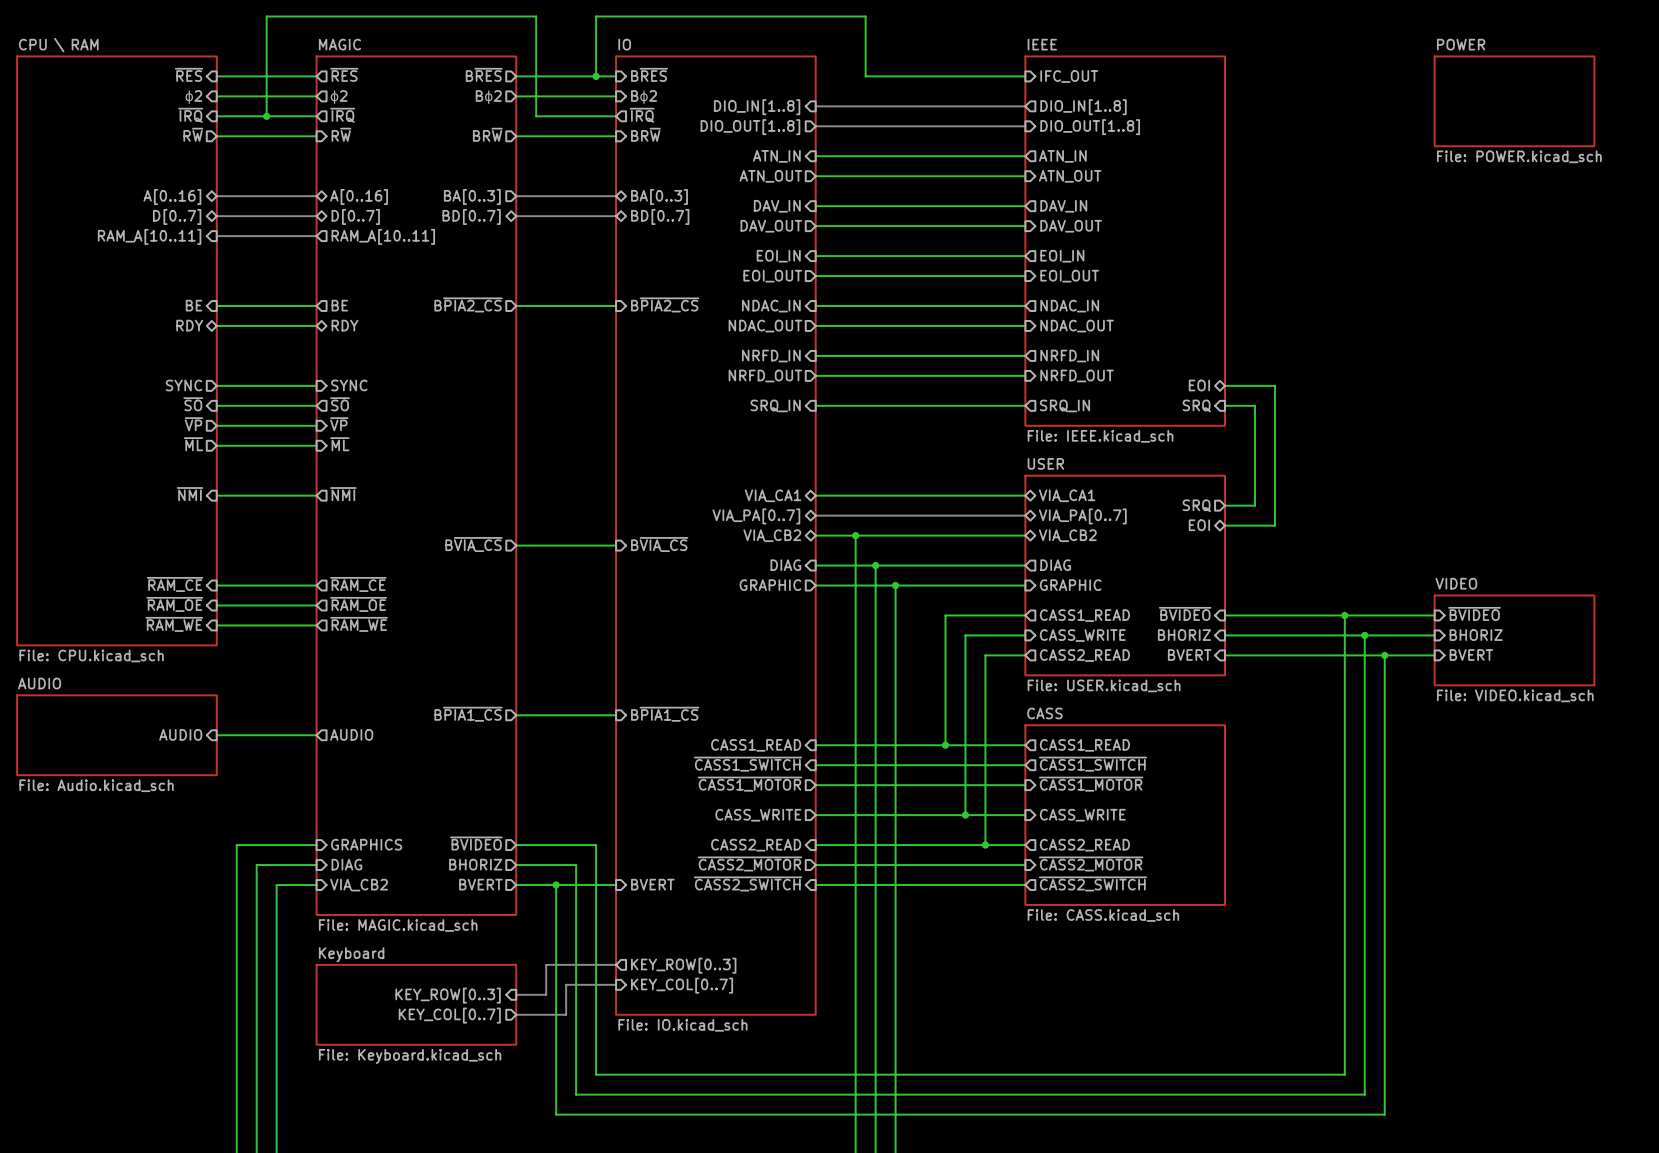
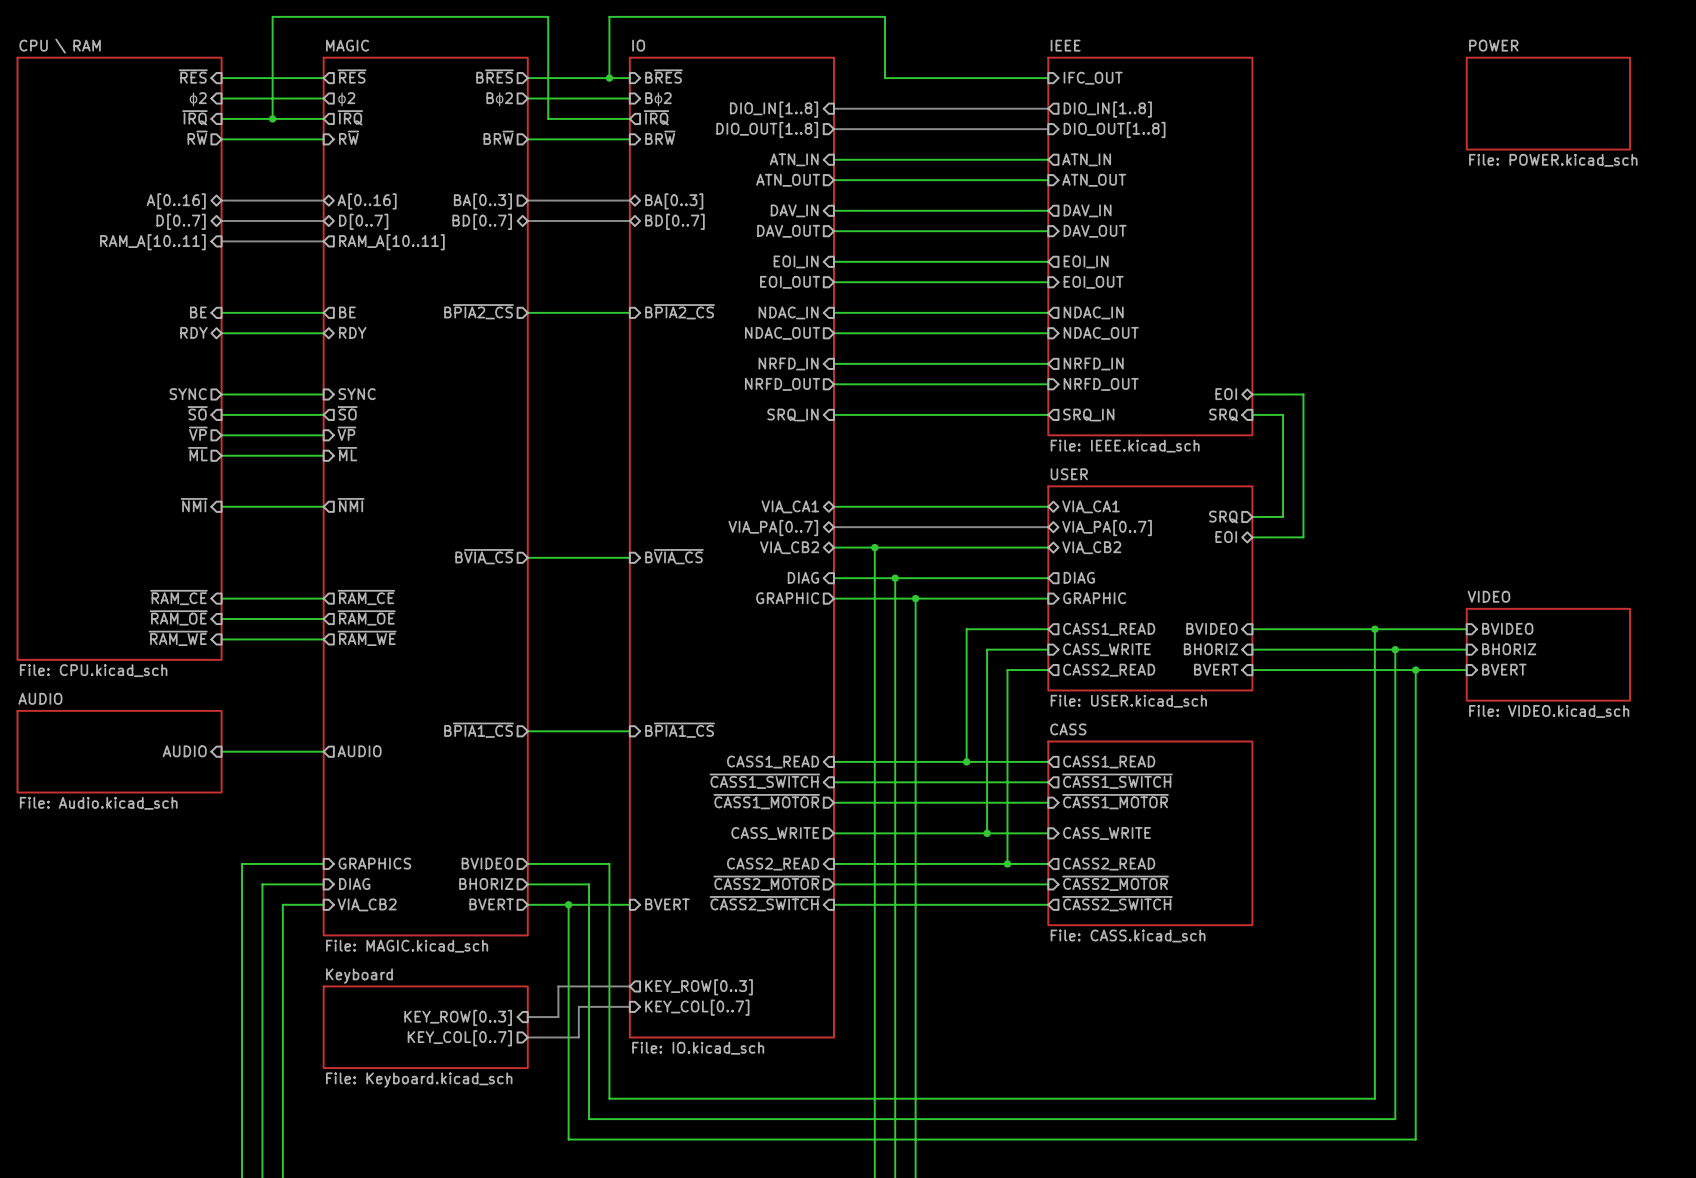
sheet pin: ~{BVIDEO} (1185, 613) -> BVIDEO (1211, 628)
sheet pin: ~{BVIDEO} (1474, 613) -> BVIDEO (1507, 628)
sheet pin: ~{BVIDEO} (476, 843) -> BVIDEO (487, 863)

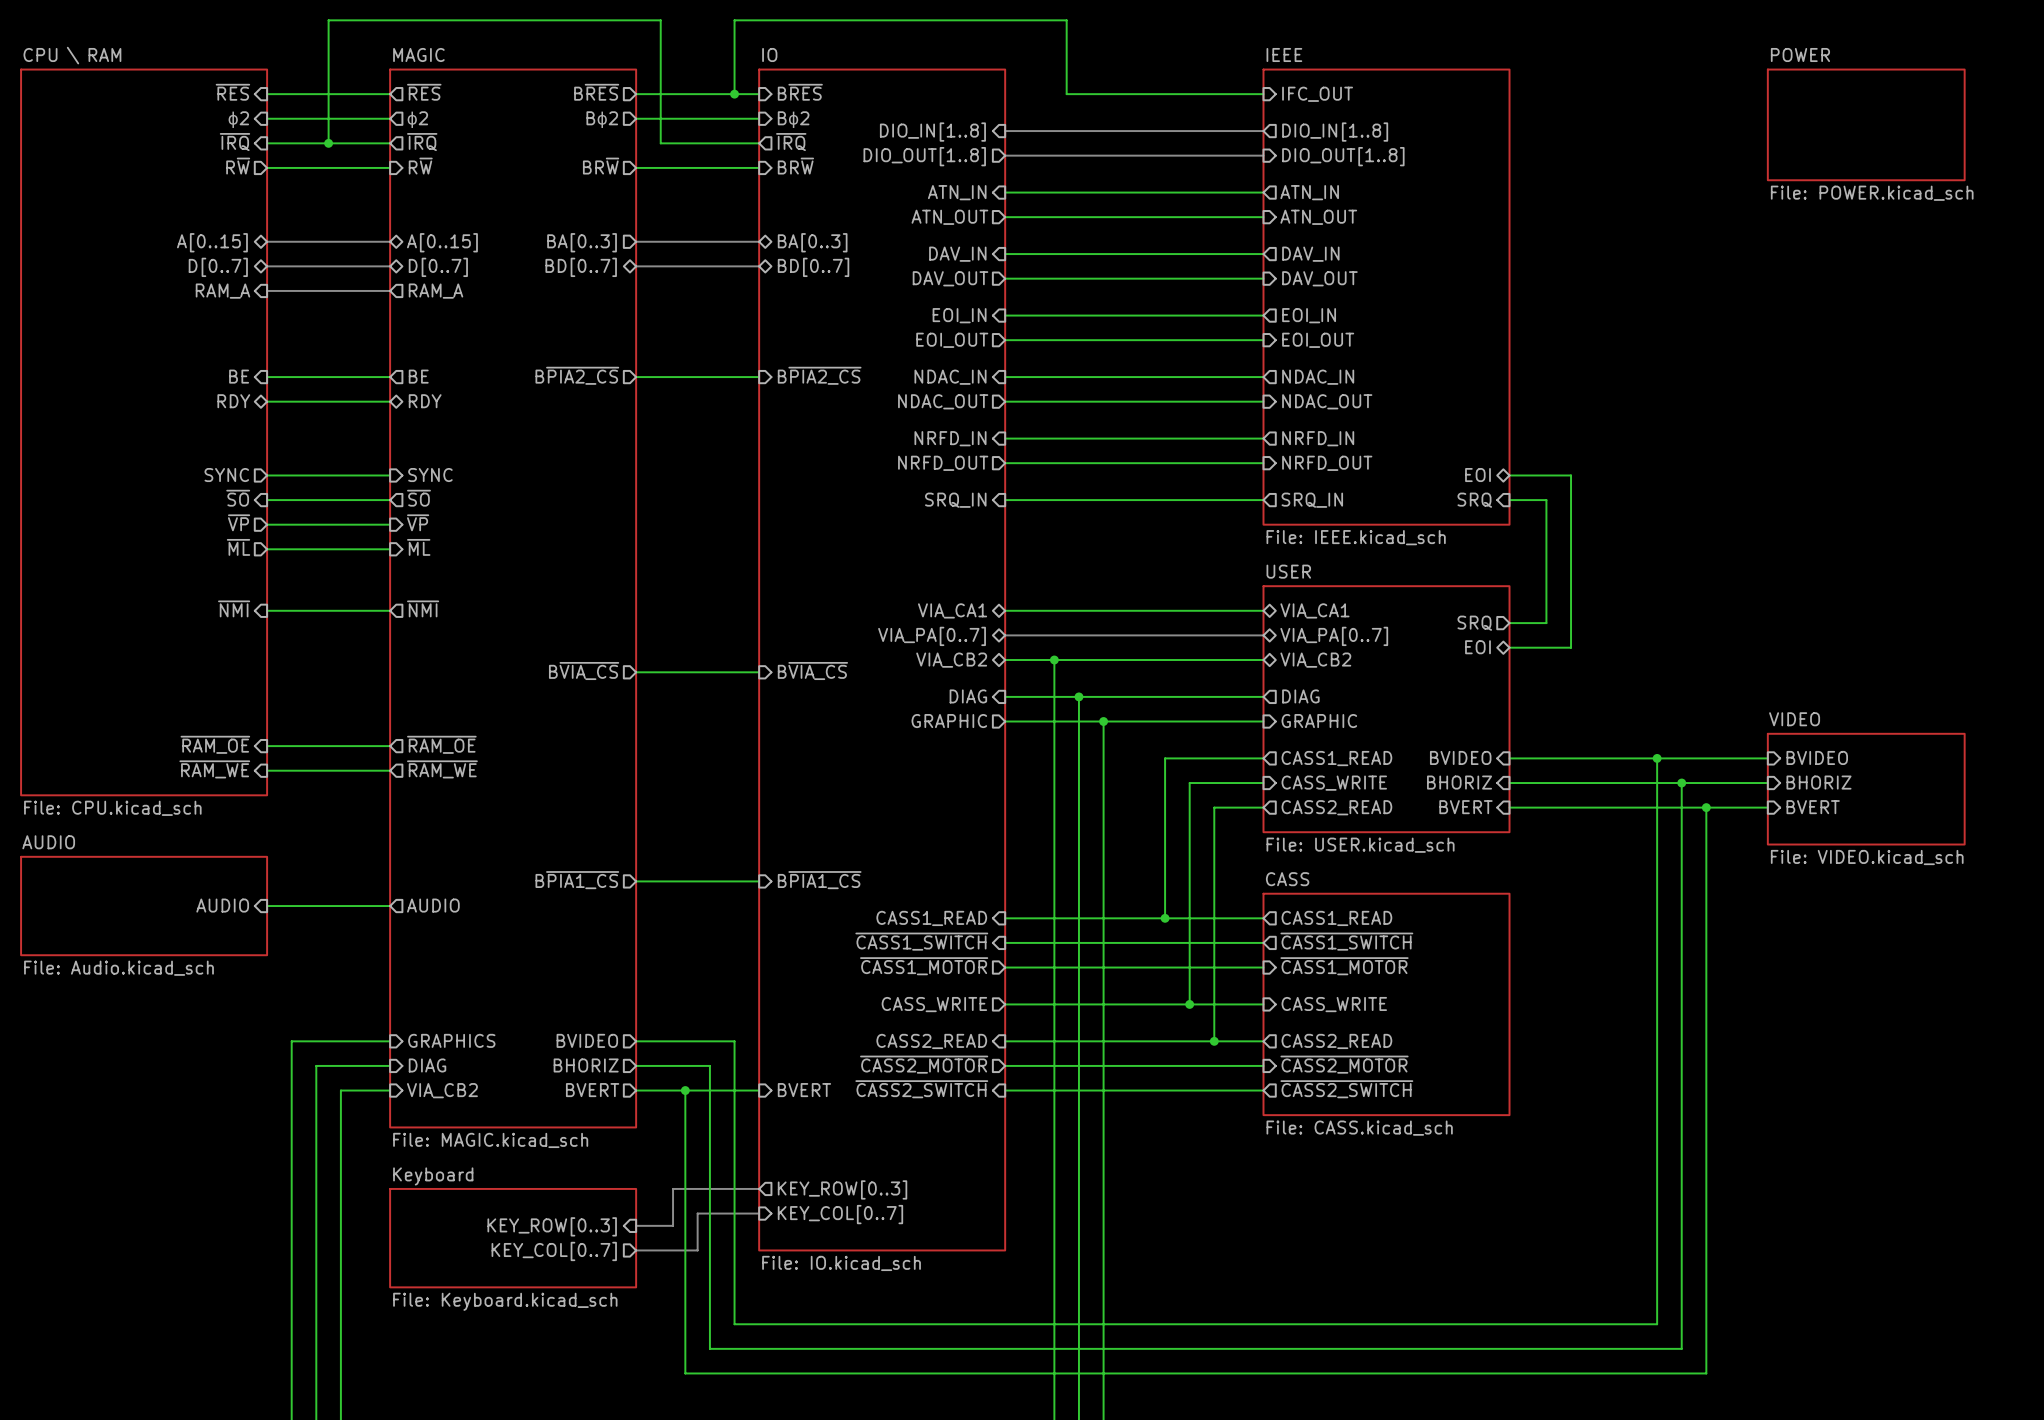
sheet pin: A[0..16] (176, 201) -> A[0..15] (212, 242)
sheet pin: A[0..16] (367, 201) -> A[0..15] (442, 242)
sheet pin: RAM_A[10..11] (152, 242) -> RAM_A (222, 291)
sheet pin: RAM_A[10..11] (391, 242) -> RAM_A (435, 291)
sheet pin: ~{RAM_CE} (178, 597) -> none
sheet pin: ~{RAM_CE} (366, 597) -> none
wire: (221, 598) (323, 598) -> none

